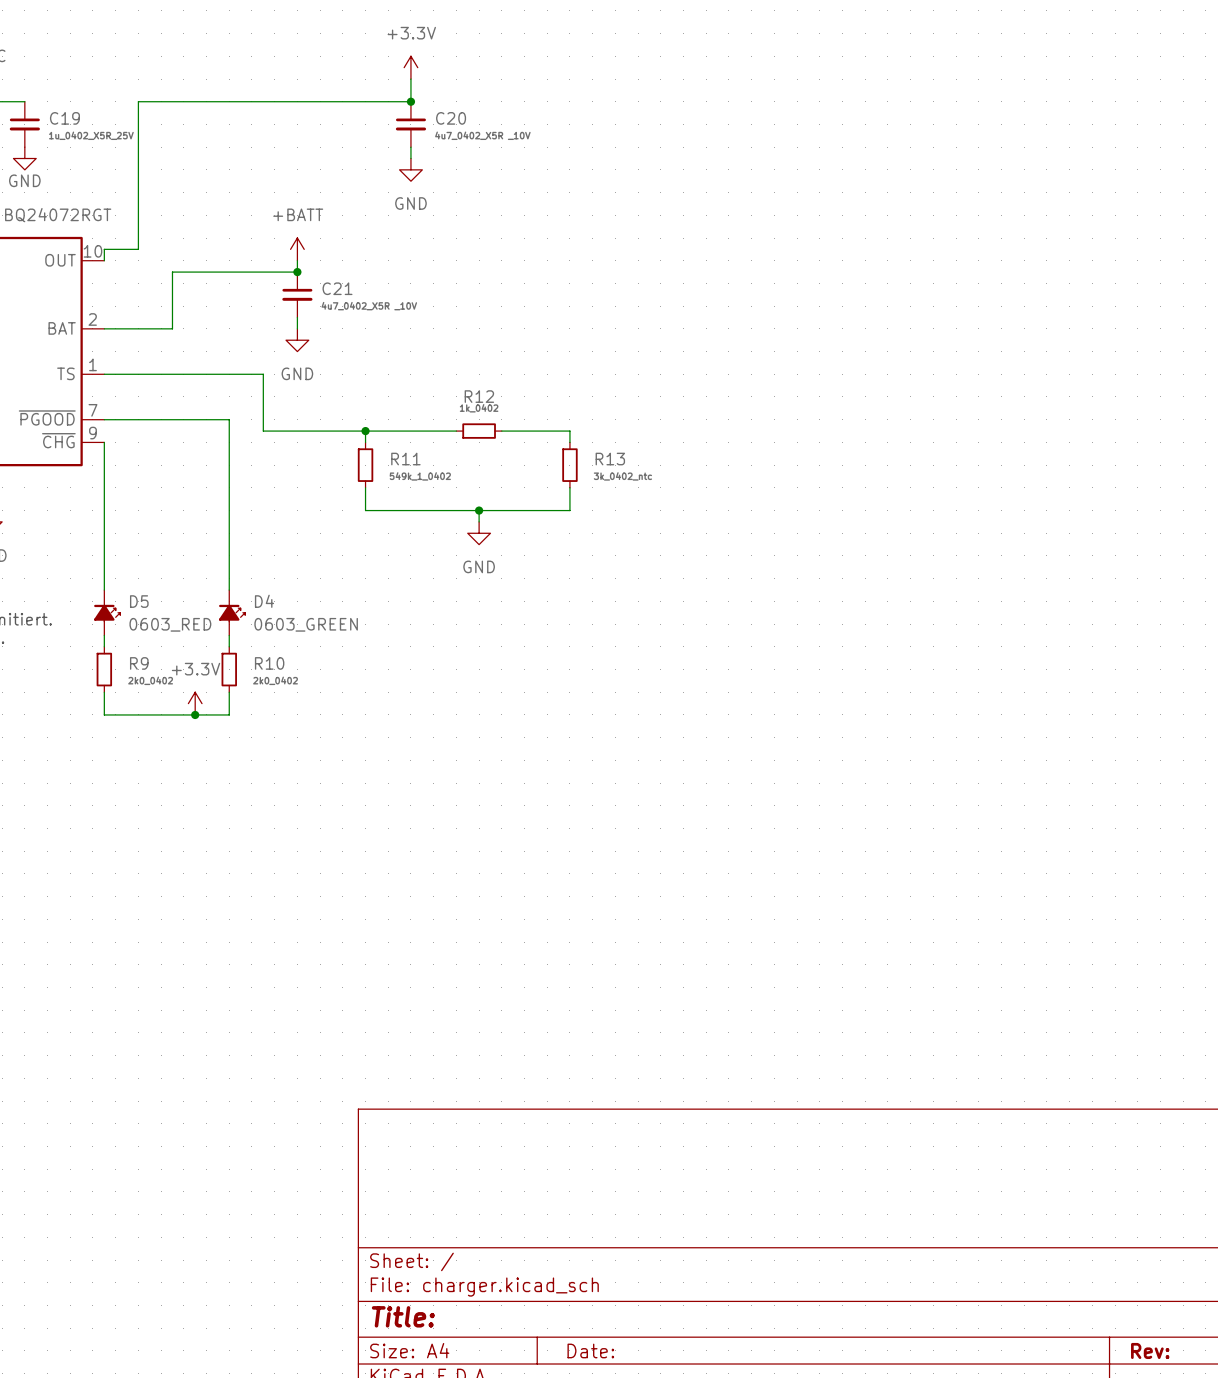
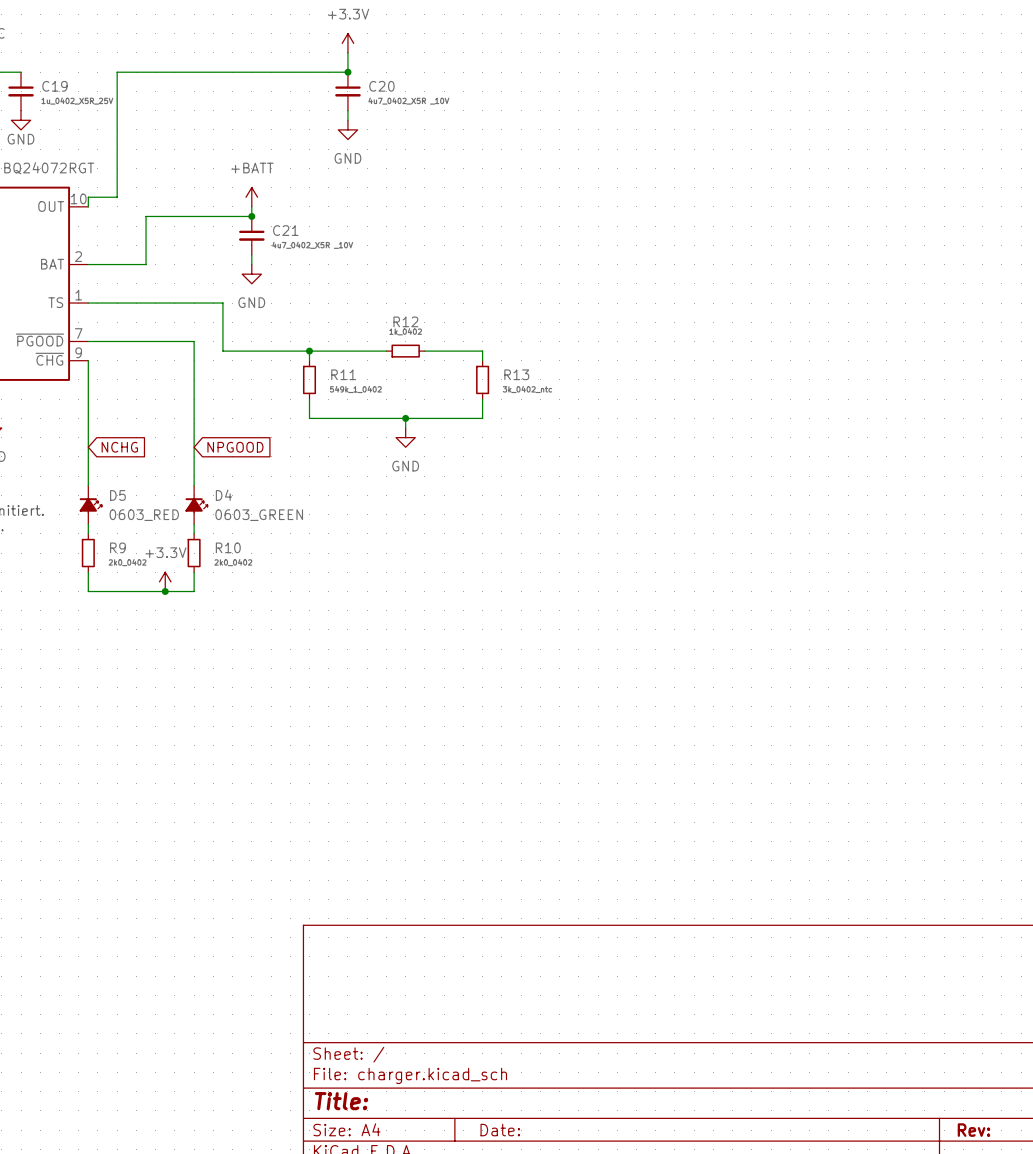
global label: none -> NCHG (119, 447)
global label: none -> NPGOOD (235, 447)

